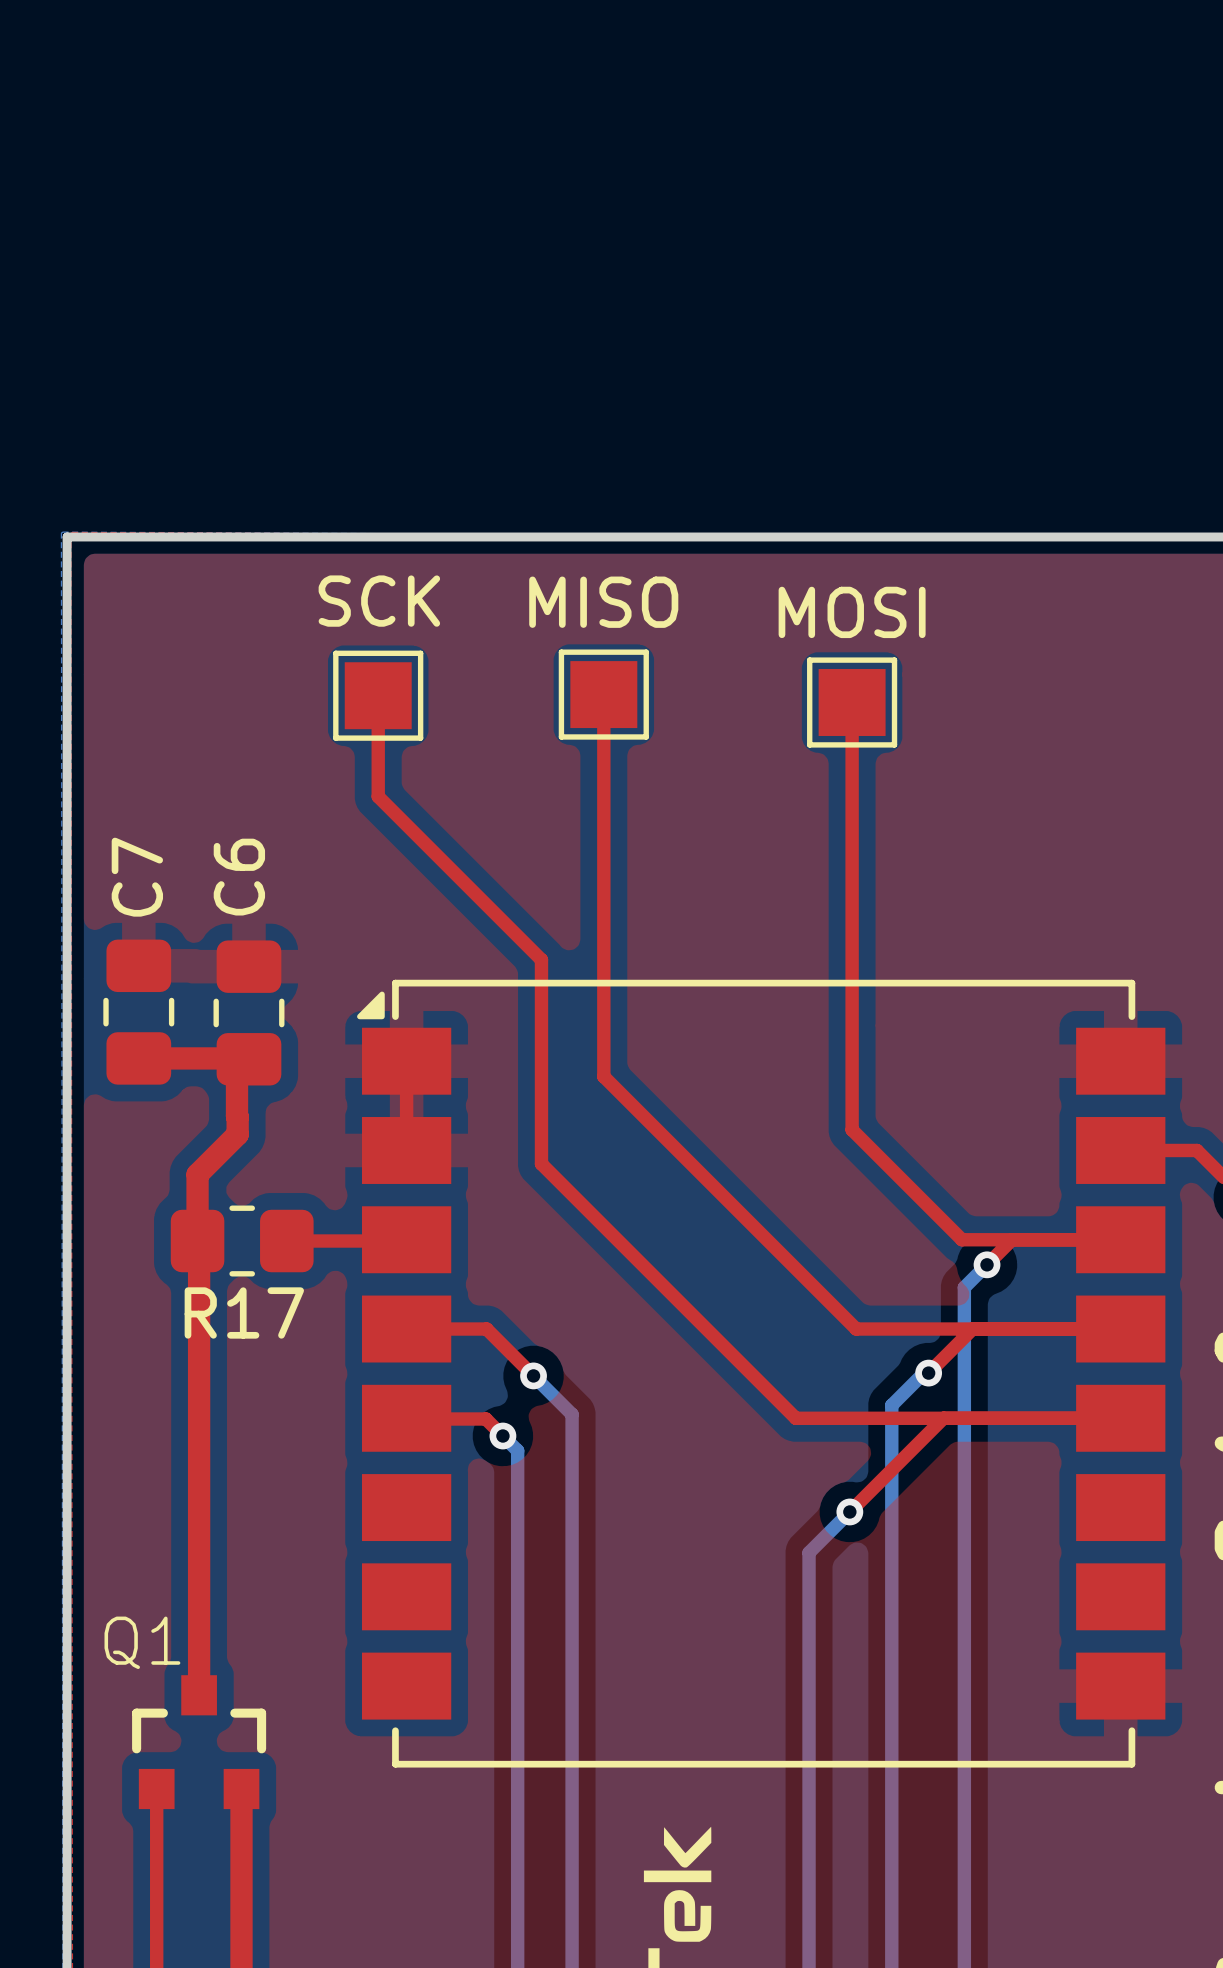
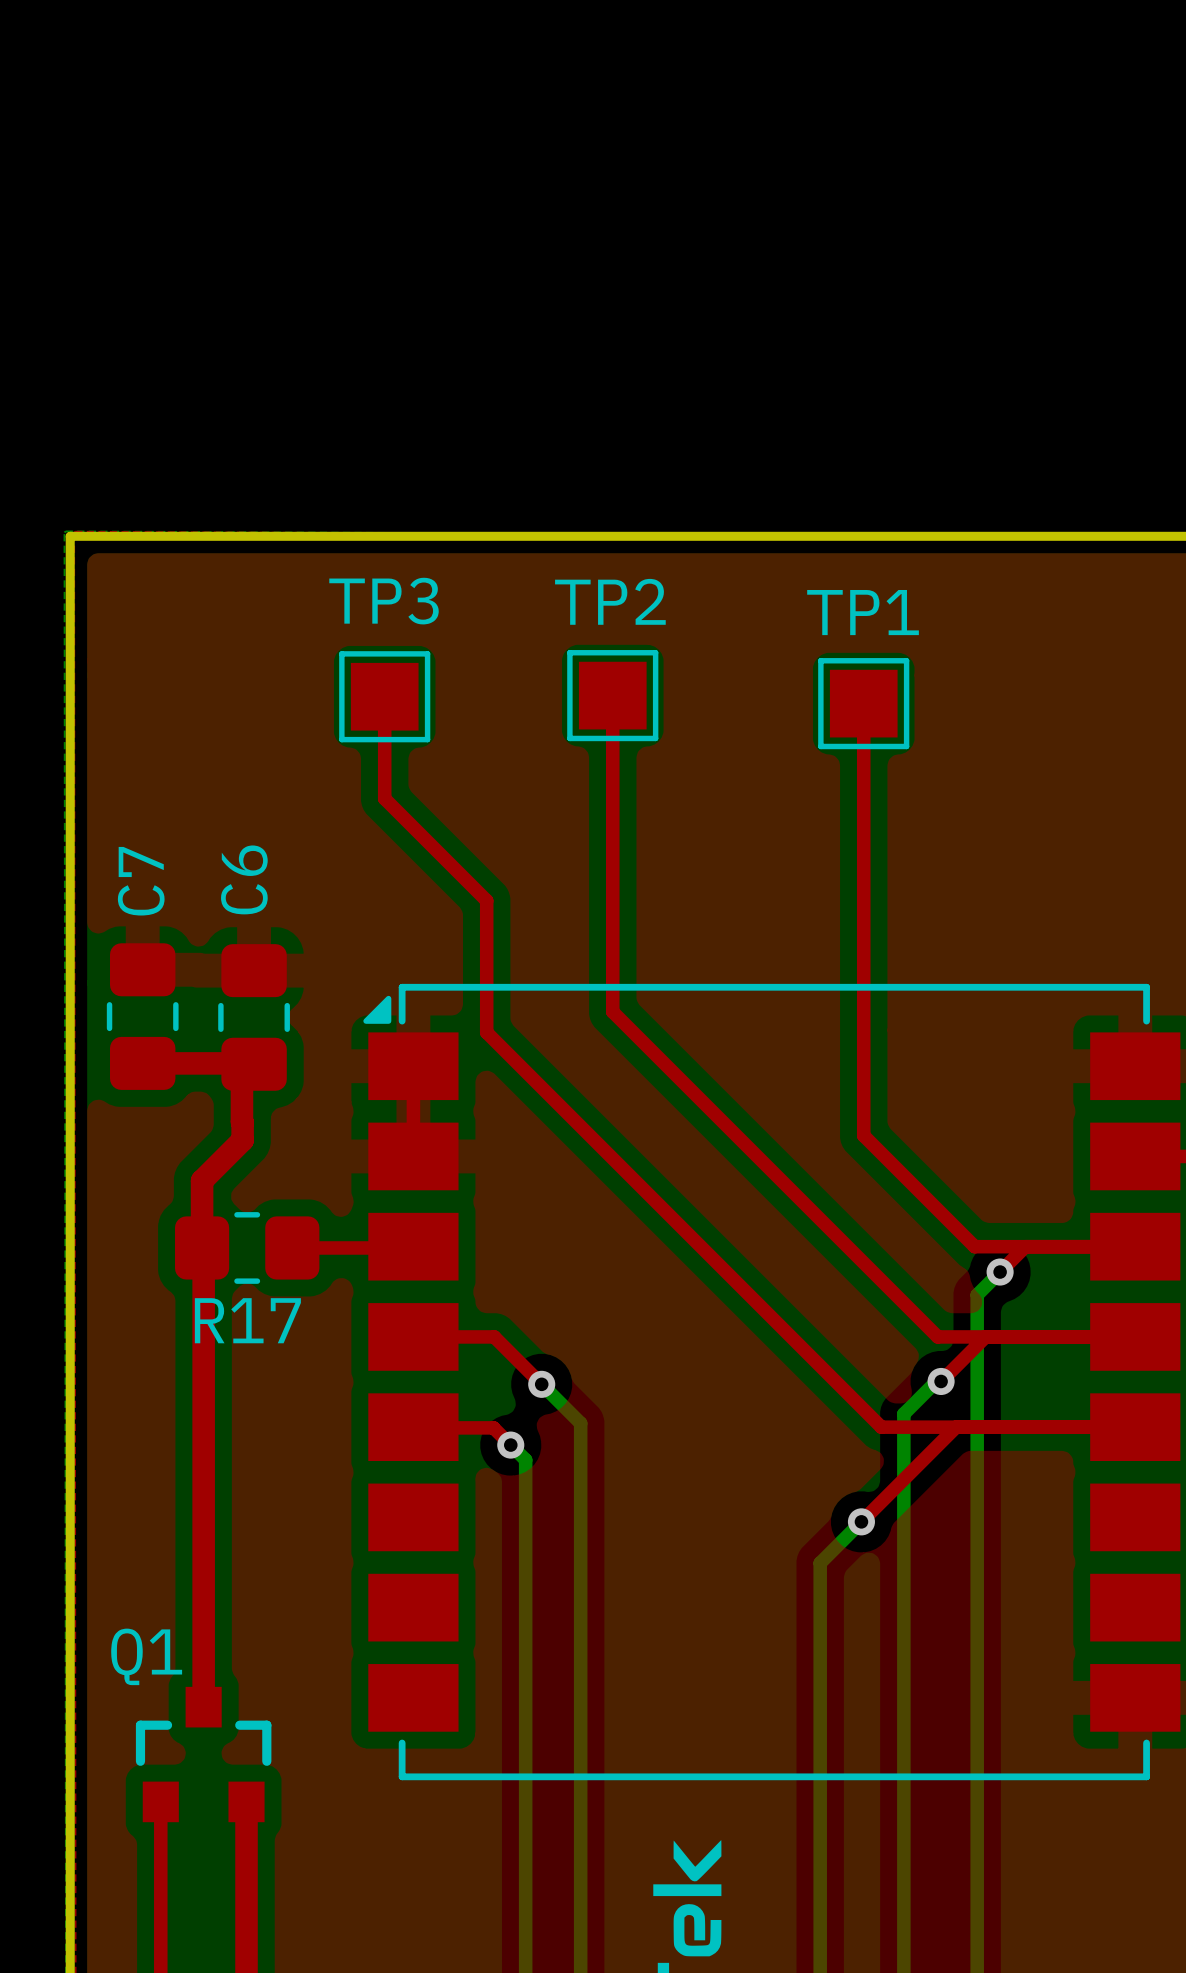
SCK name: SCK (379, 601) -> TP3 (384, 601)
MISO name: MISO (603, 602) -> TP2 (610, 601)
MOSI name: MOSI (852, 612) -> TP1 (863, 612)
top track: (479, 897) (541, 959) (541, 1163) (795, 1418) (869, 1418) -> (486, 900) (486, 1032) (881, 1427)
top track: (603, 1007) (603, 1076) (856, 1329) (925, 1329) -> (612, 1011) (937, 1336)

